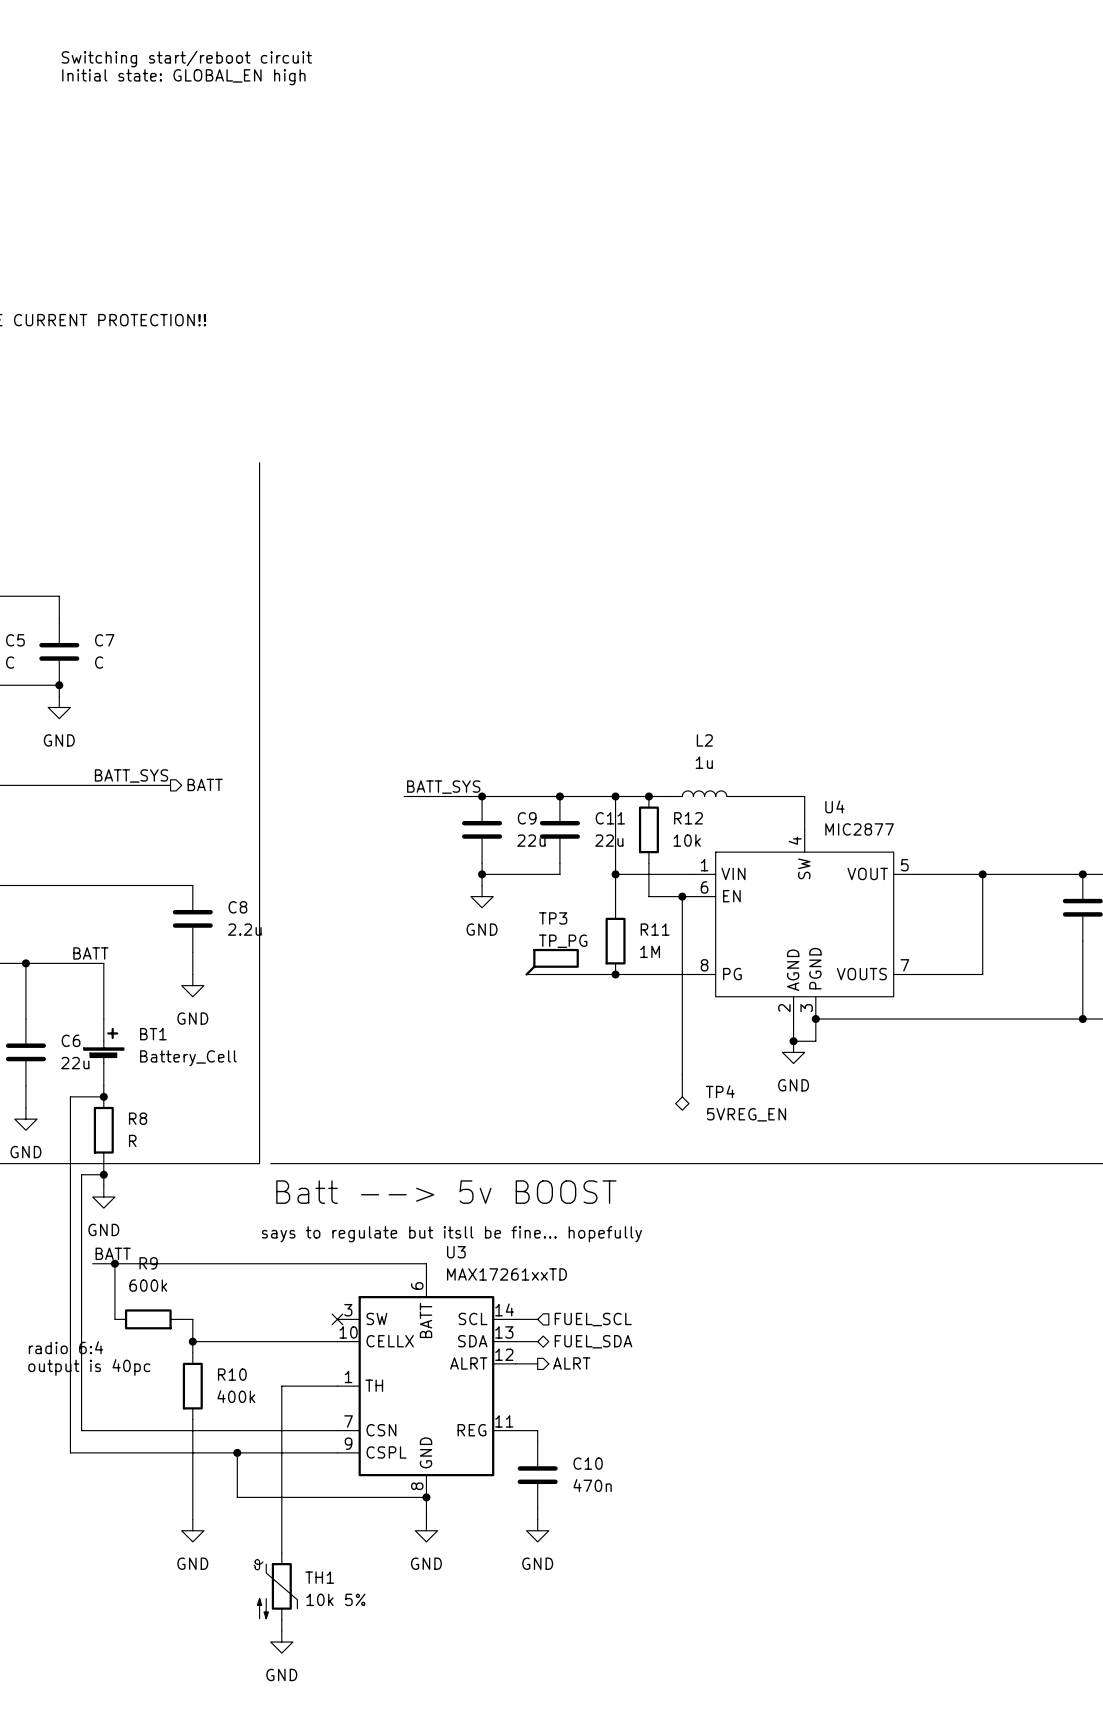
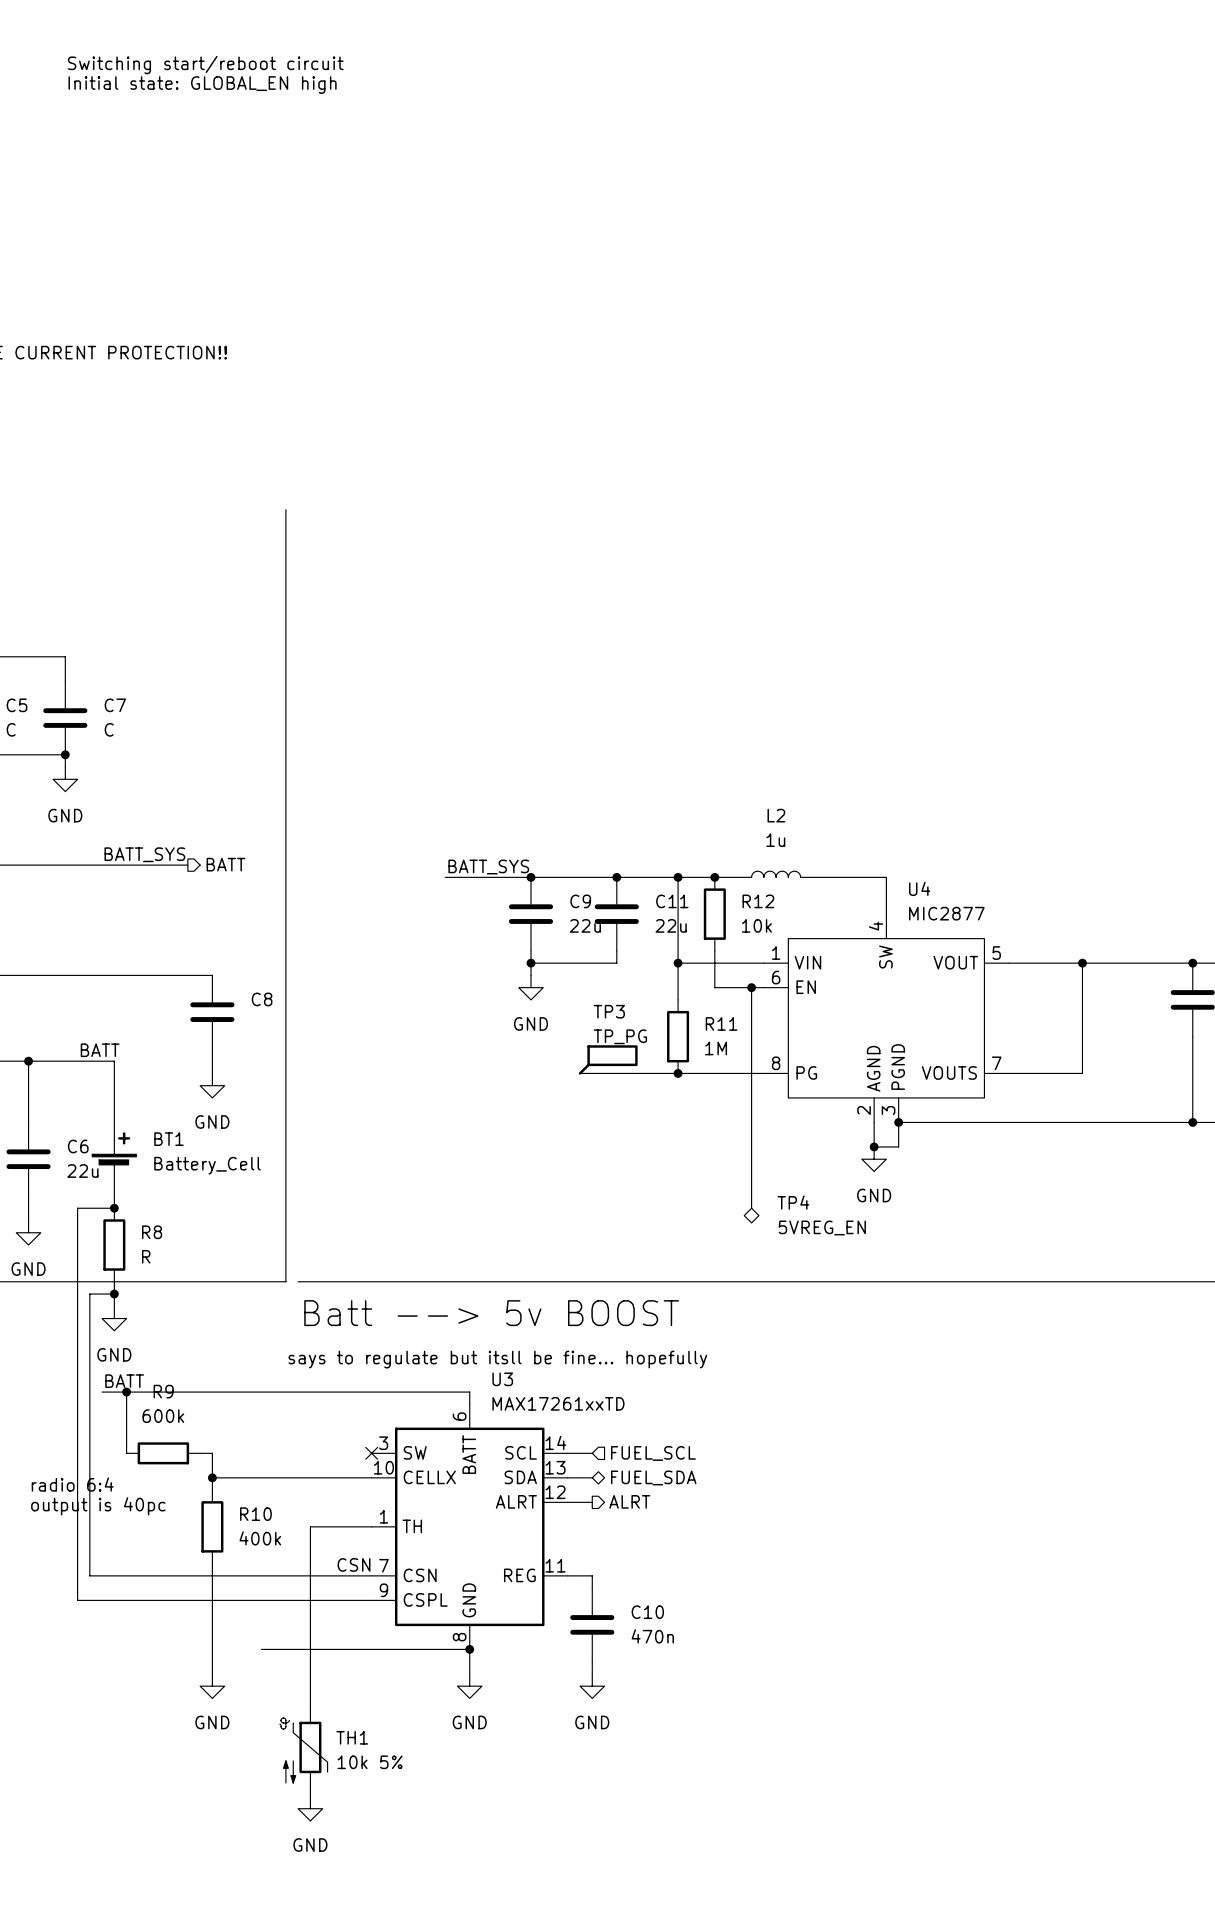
C8 value: 2.2u (244, 929) -> none
label: none -> CSN (353, 1564)
wire: (237, 1452) (237, 1497) -> none
junction: (237, 1452) -> none

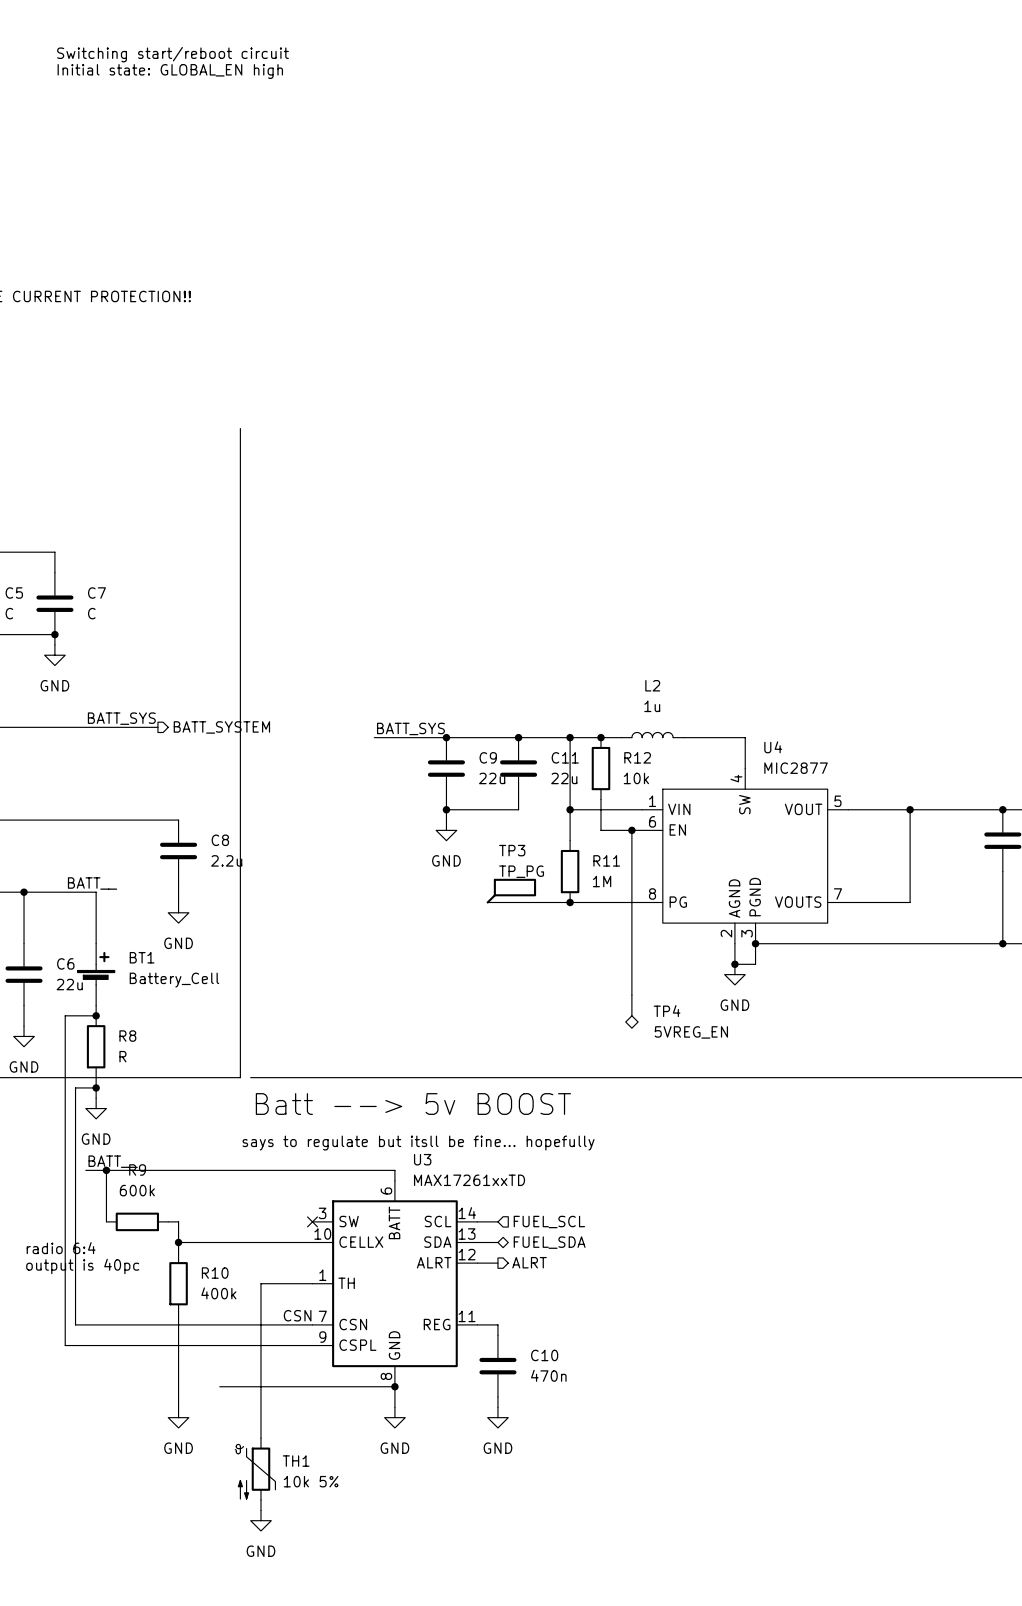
hierarchical label: BATT (226, 864) -> BATT_SYSTEM (221, 727)
C8 value: none -> 2.2u (226, 860)
label: BATT (100, 1050) -> BATT__ (92, 883)
label: BATT (124, 1381) -> BATT__ (113, 1161)

